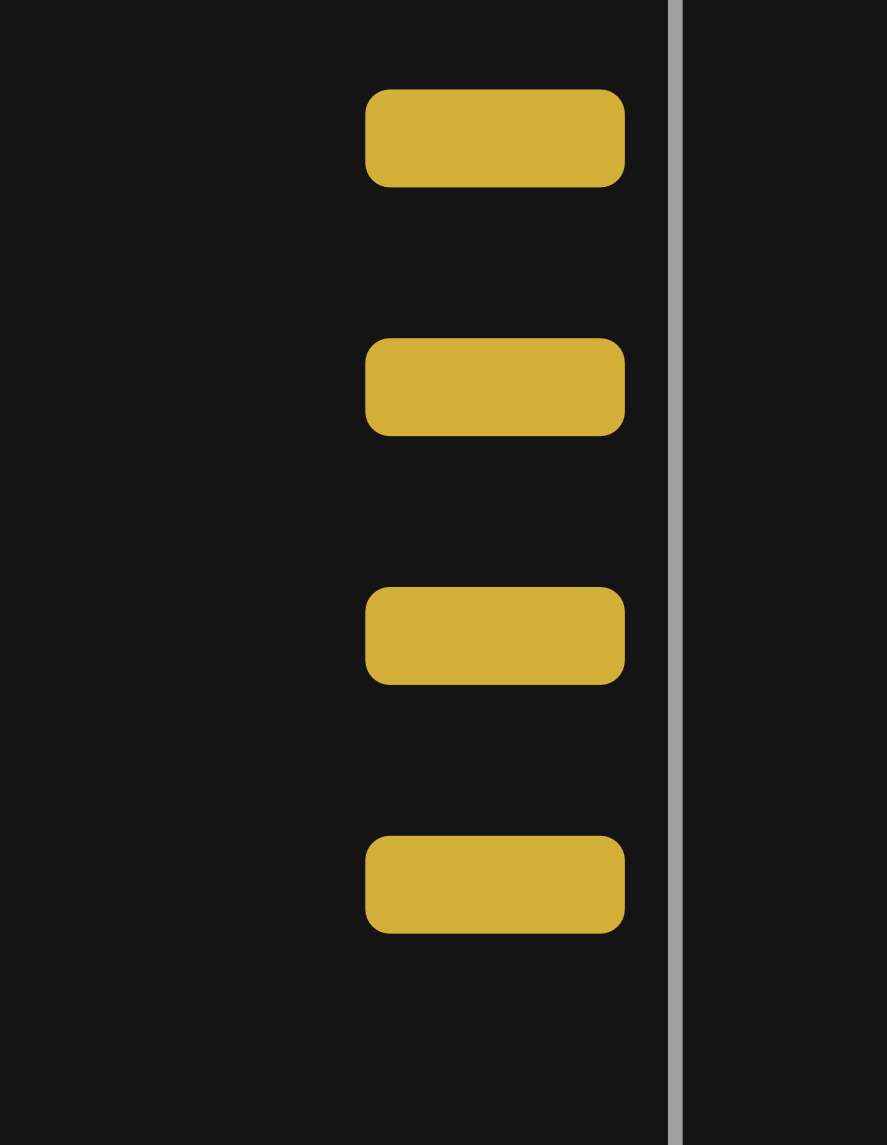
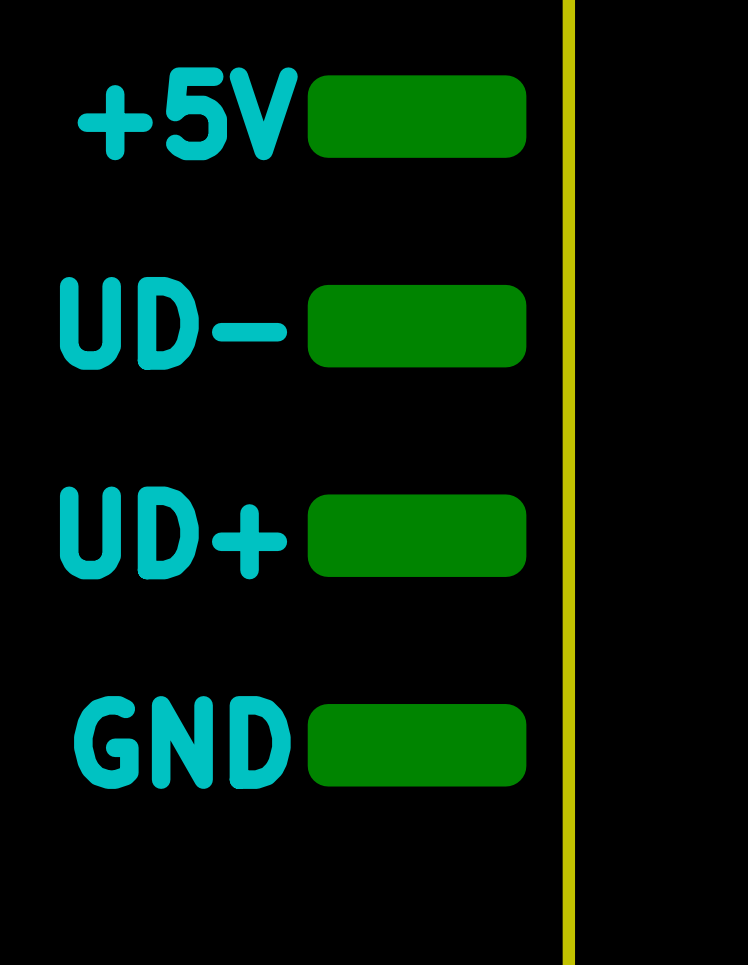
text: none -> +5V (187, 113)
text: none -> UD- (173, 323)
text: none -> UD+ (173, 532)
text: none -> GND (182, 742)

